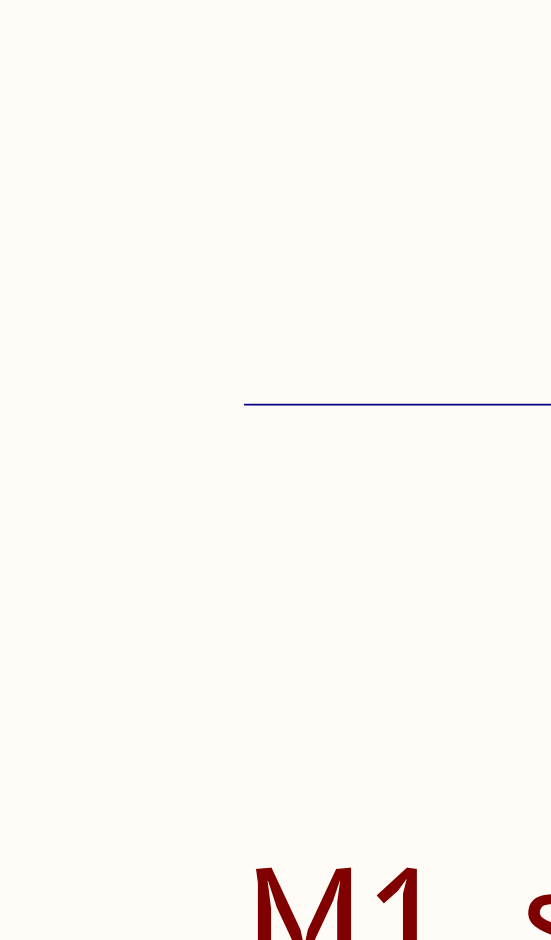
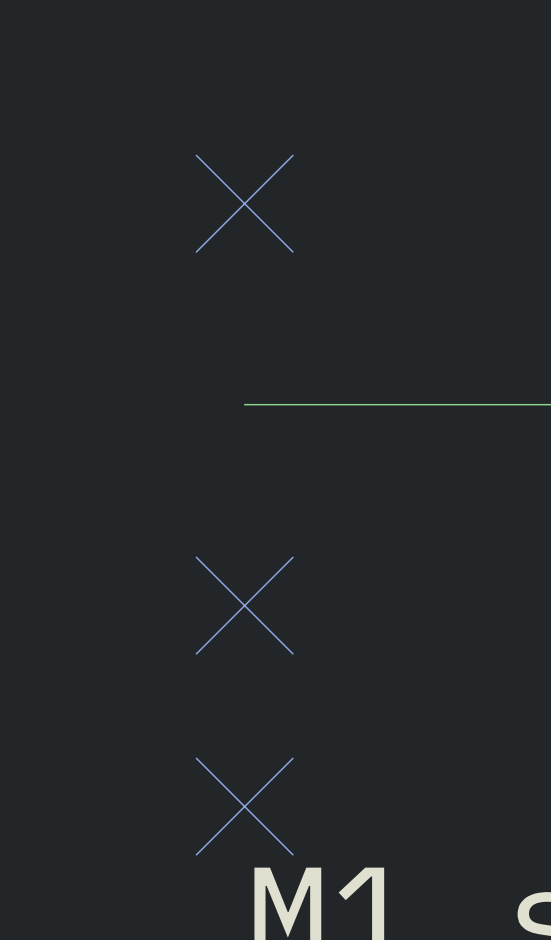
no-connect mark: none -> (244, 203)
no-connect mark: none -> (244, 605)
no-connect mark: none -> (244, 806)

